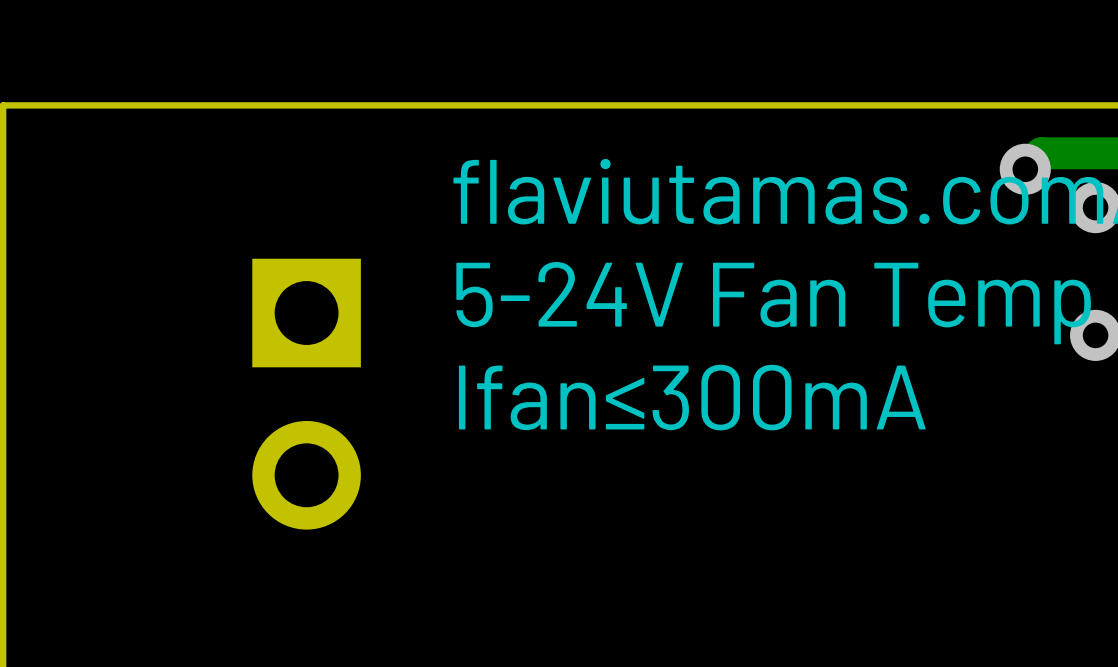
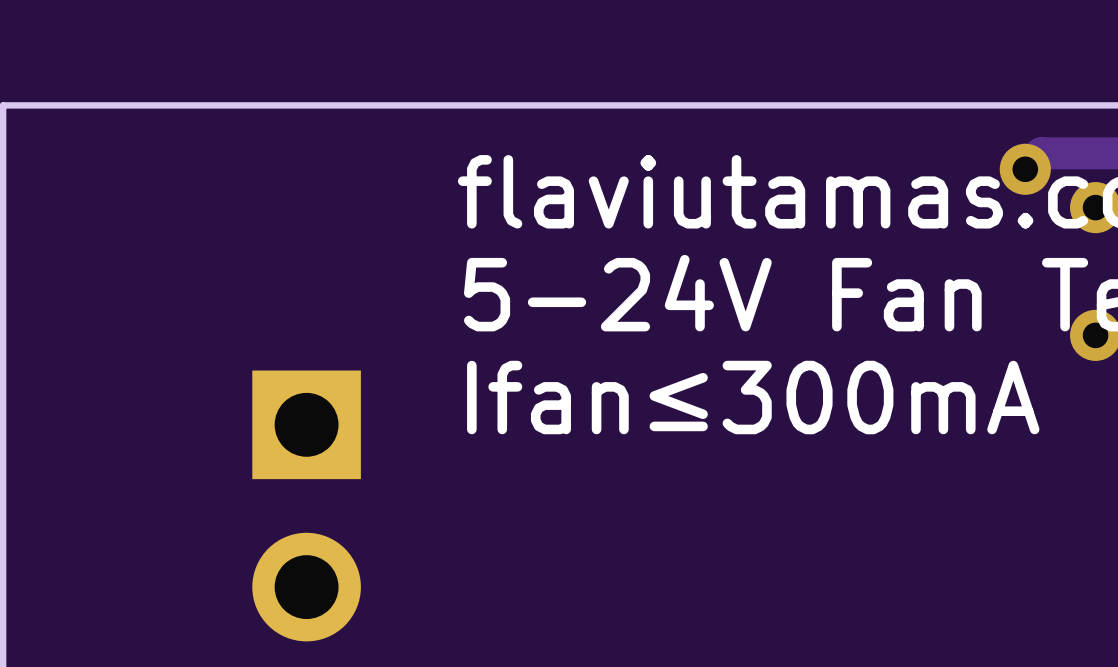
part position: (306, 394) -> (306, 505)

